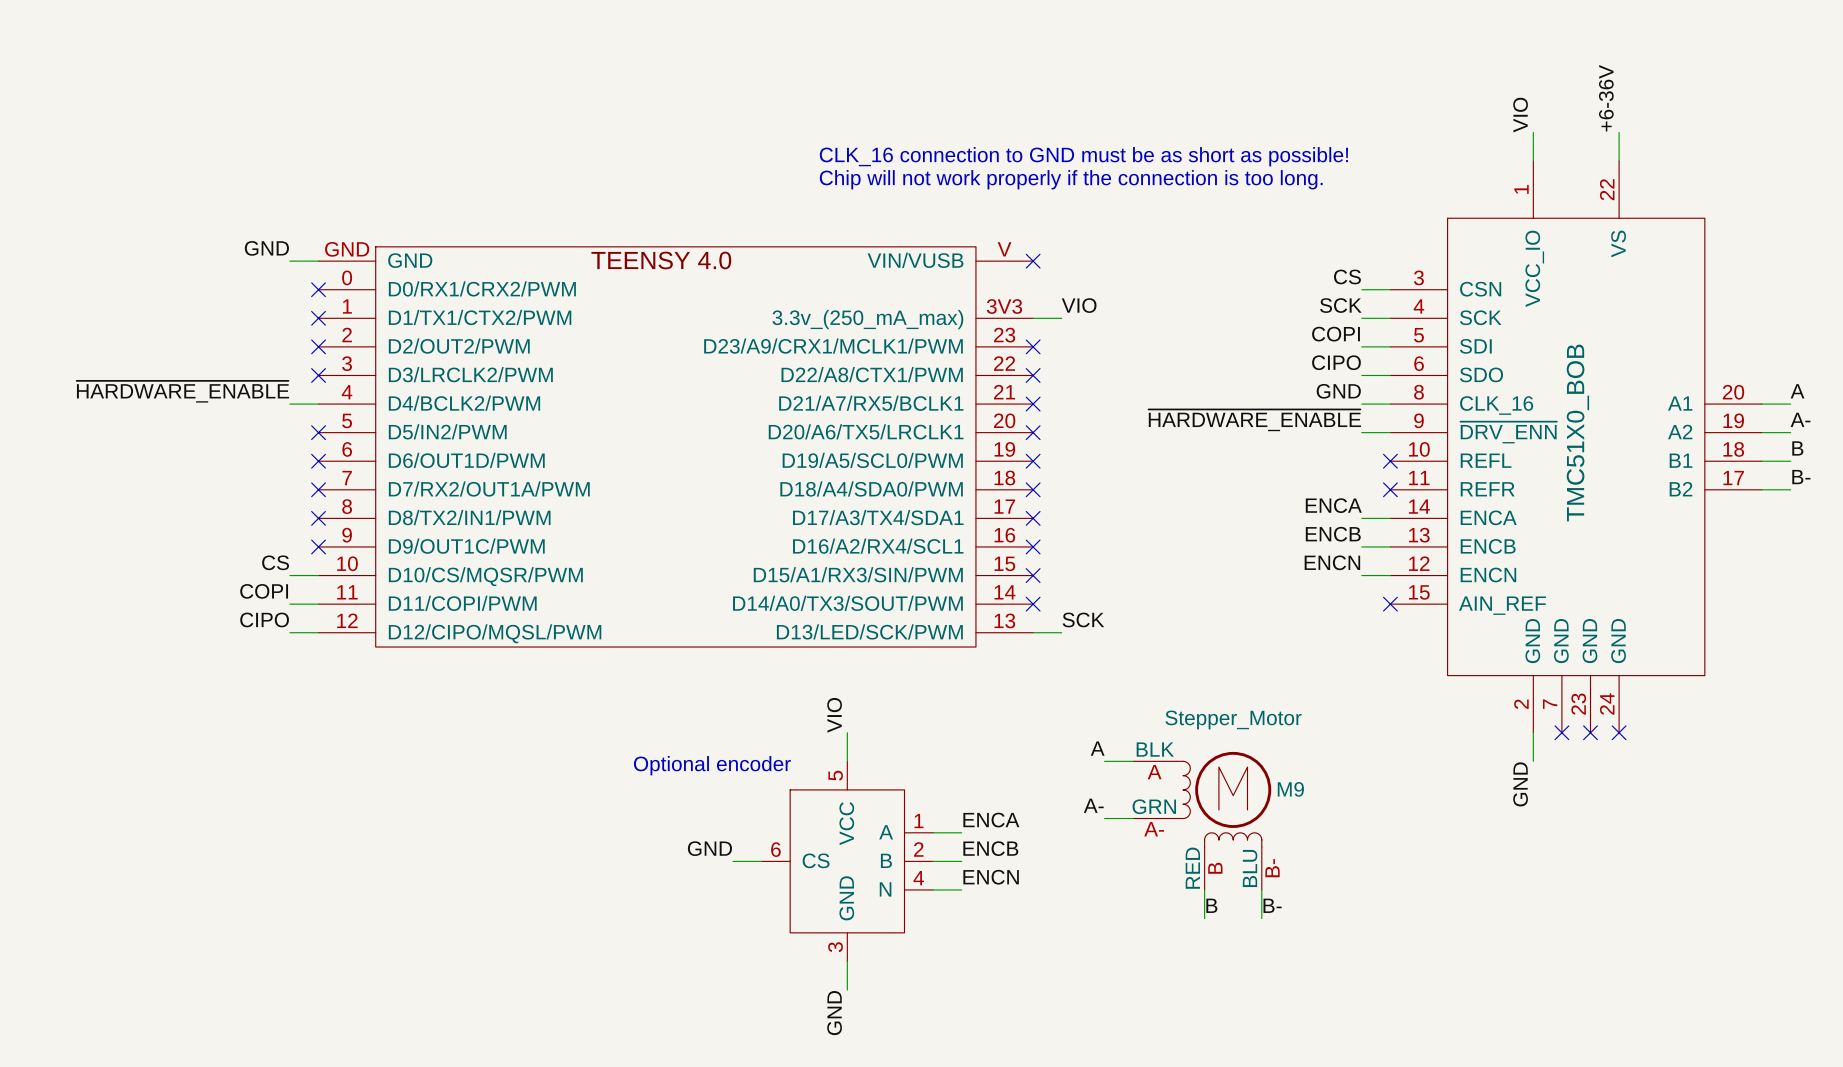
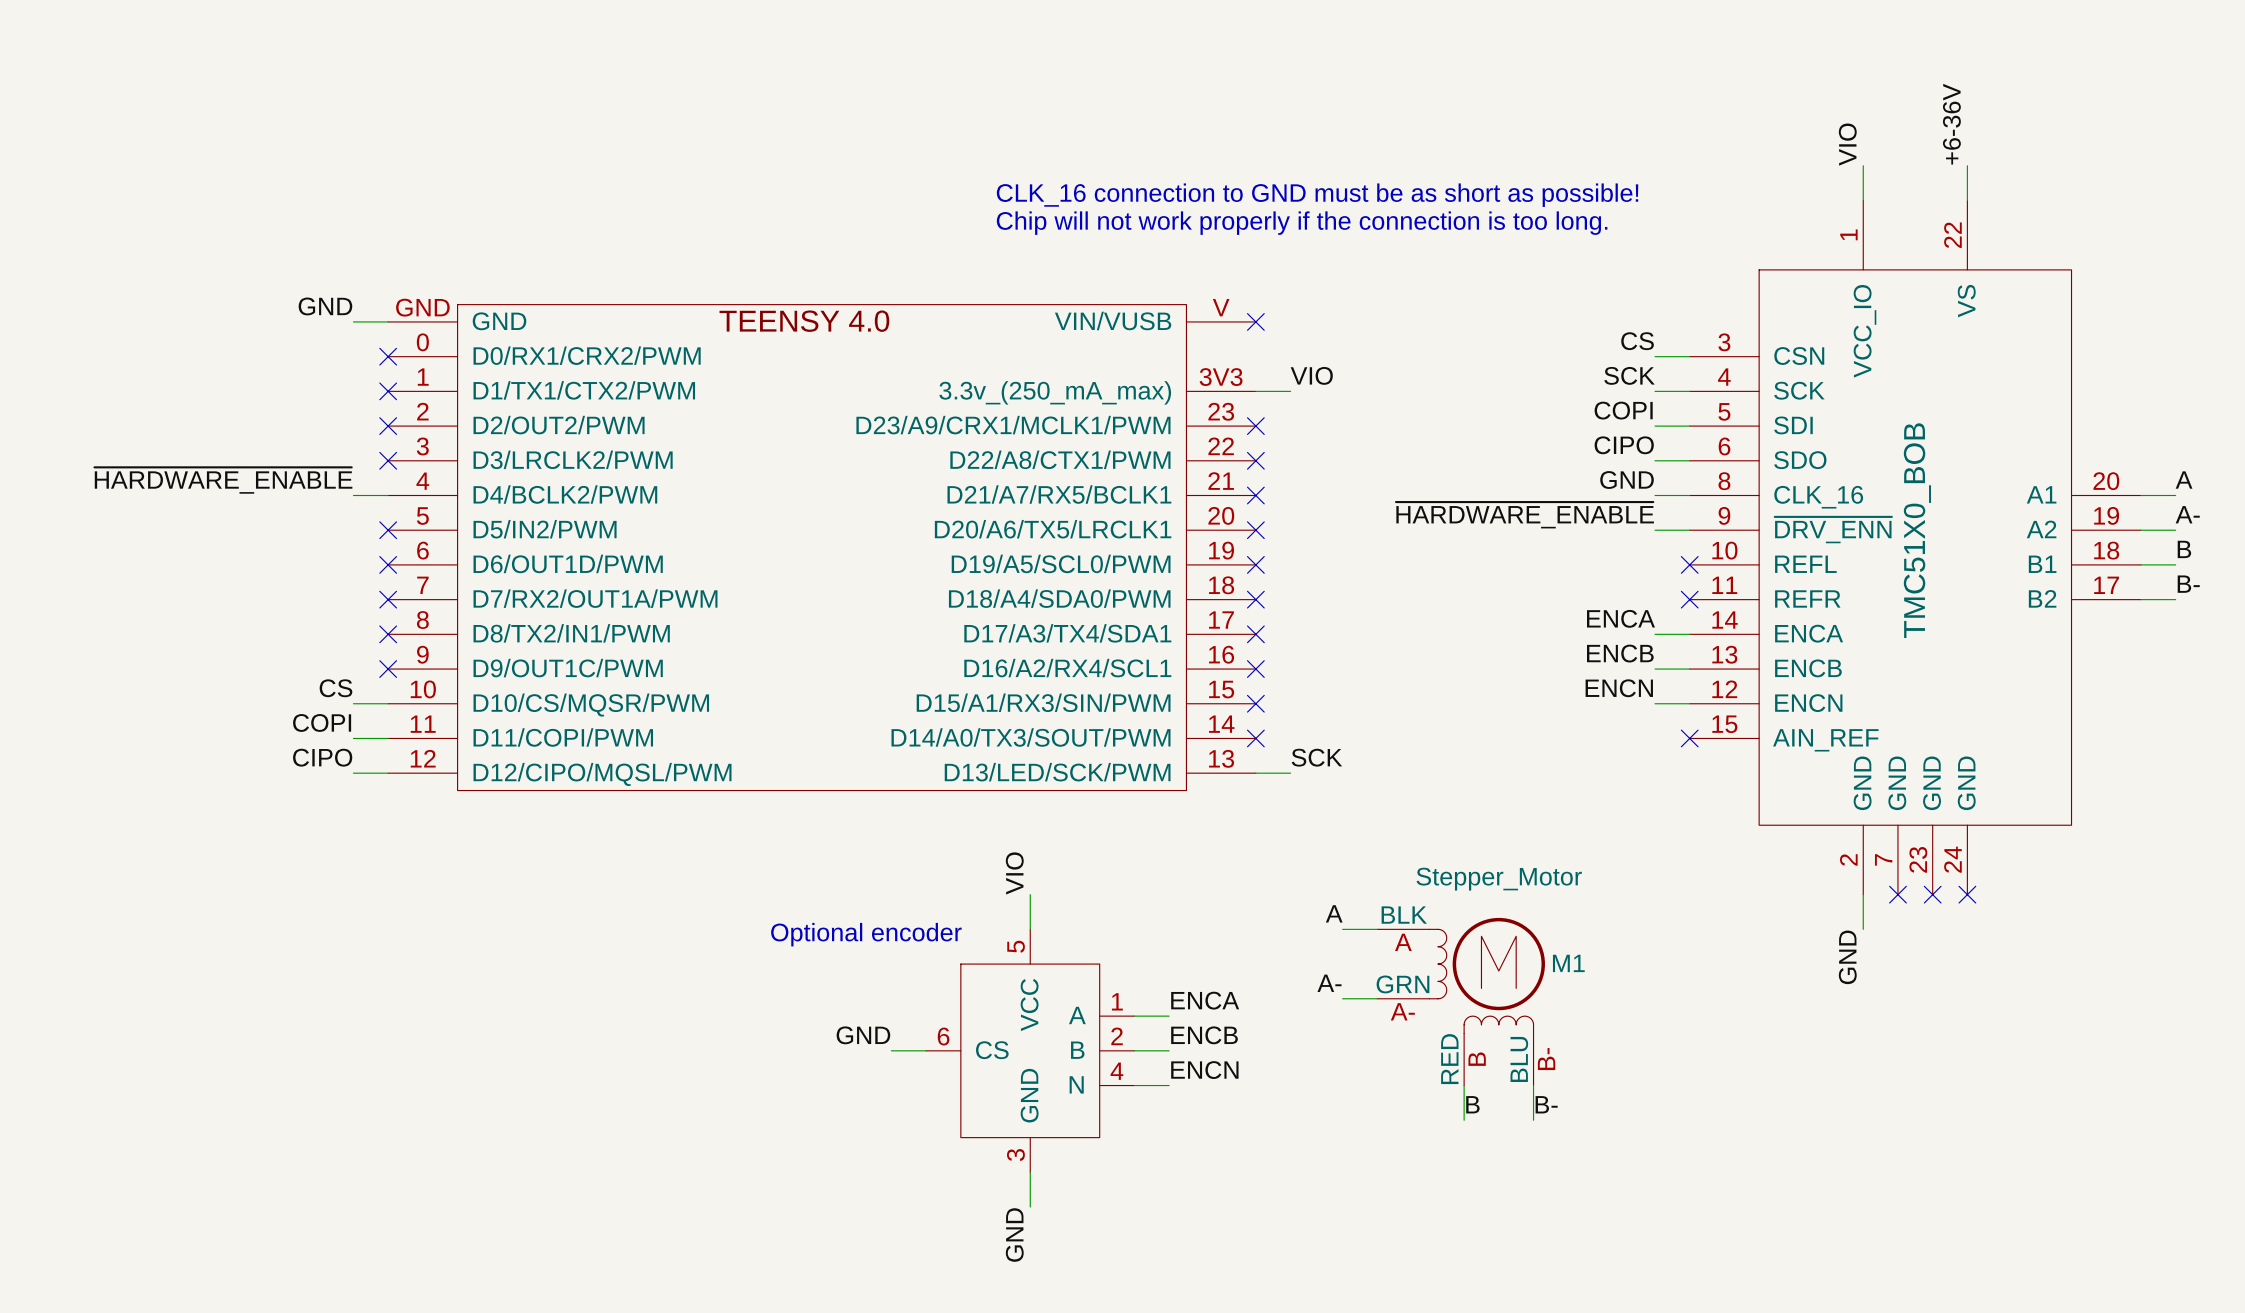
M9 name: M9 (1290, 789) -> M1 (1568, 963)

